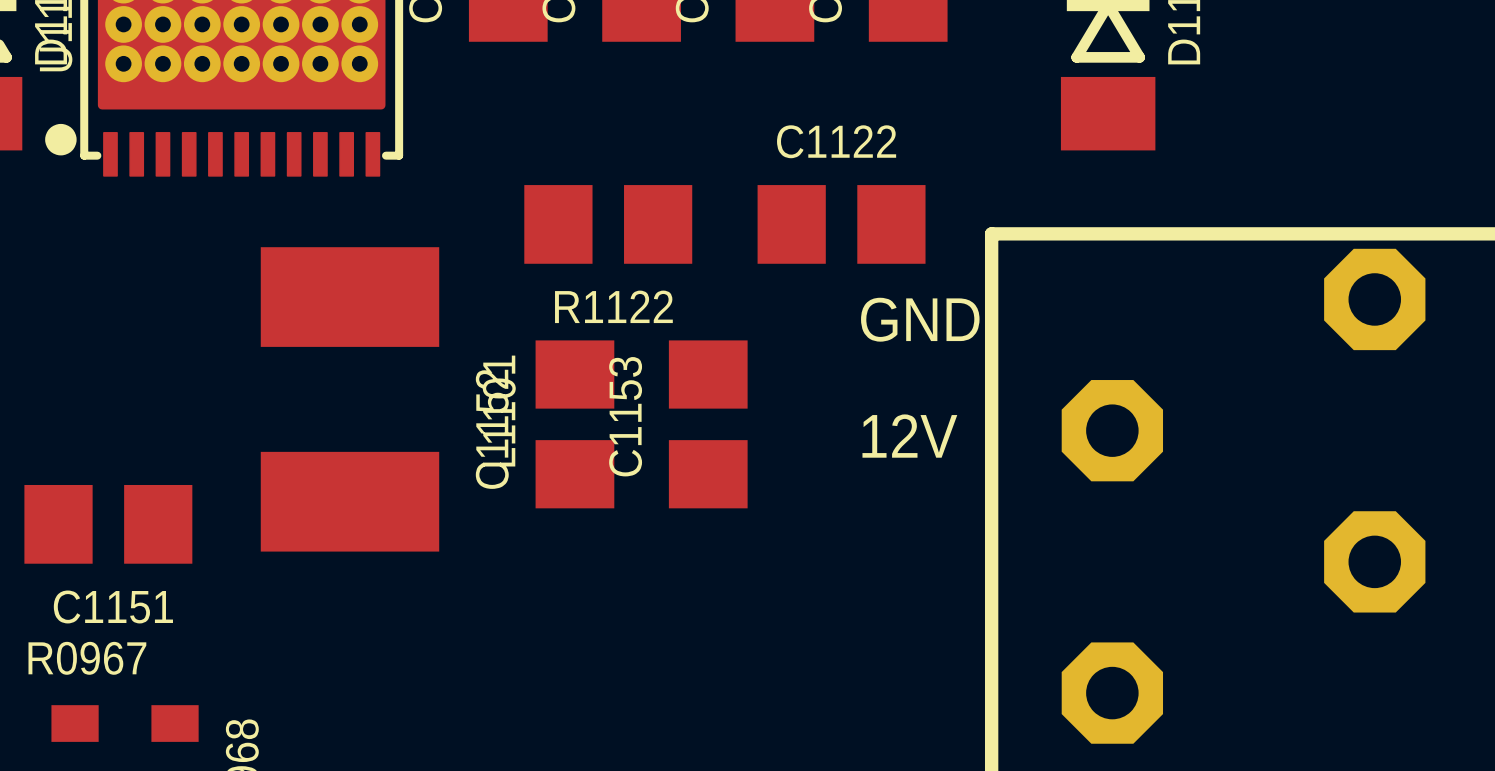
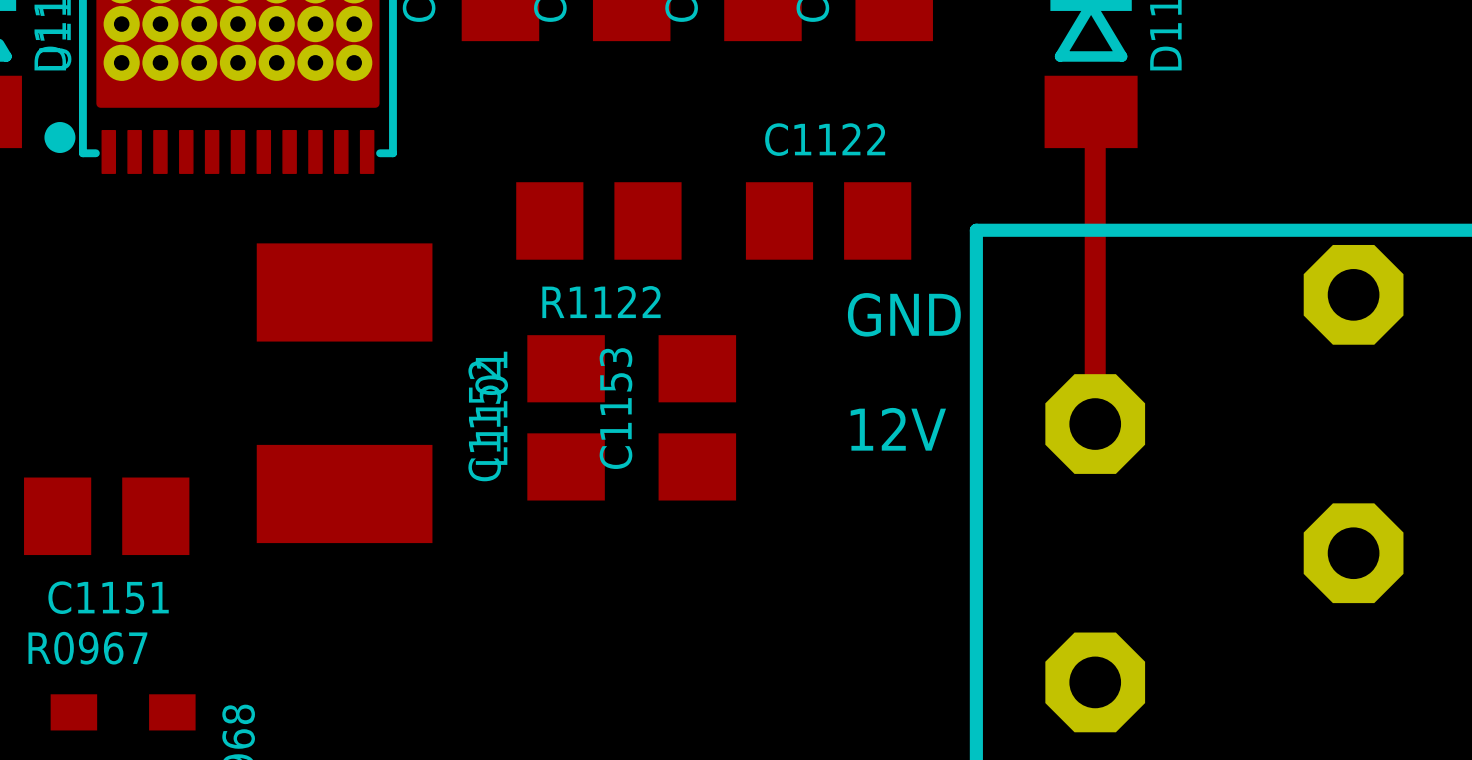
track: none -> (1095, 111) (1095, 424)

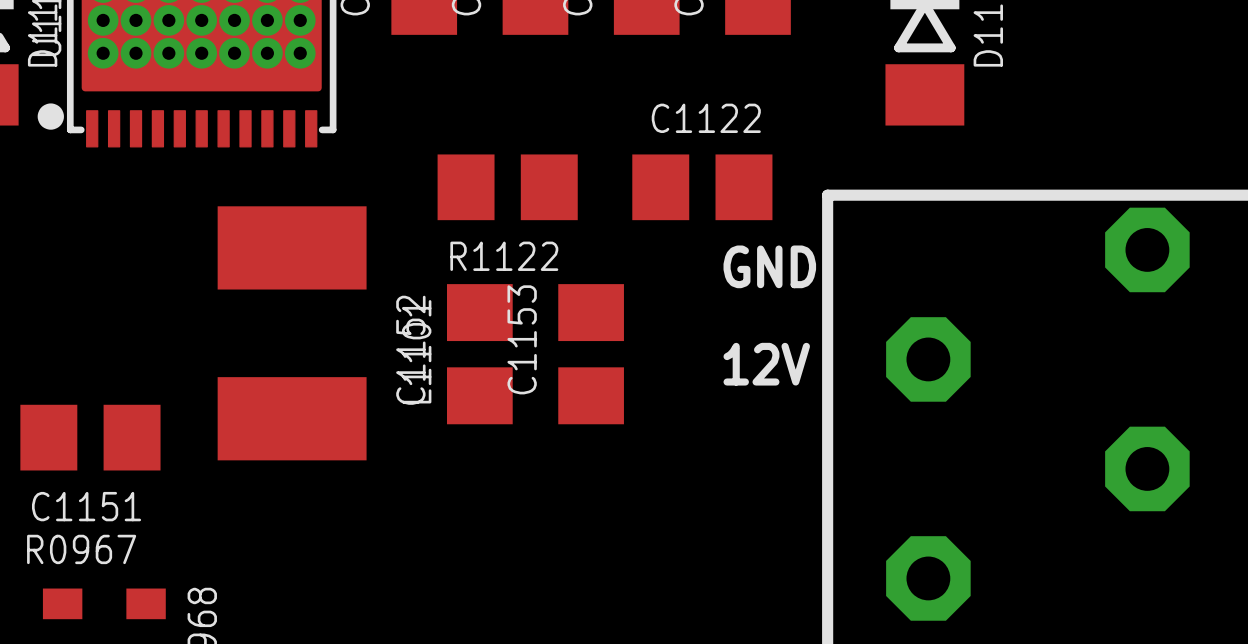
track: (1091, 111) (1095, 111) (1095, 424) -> none

